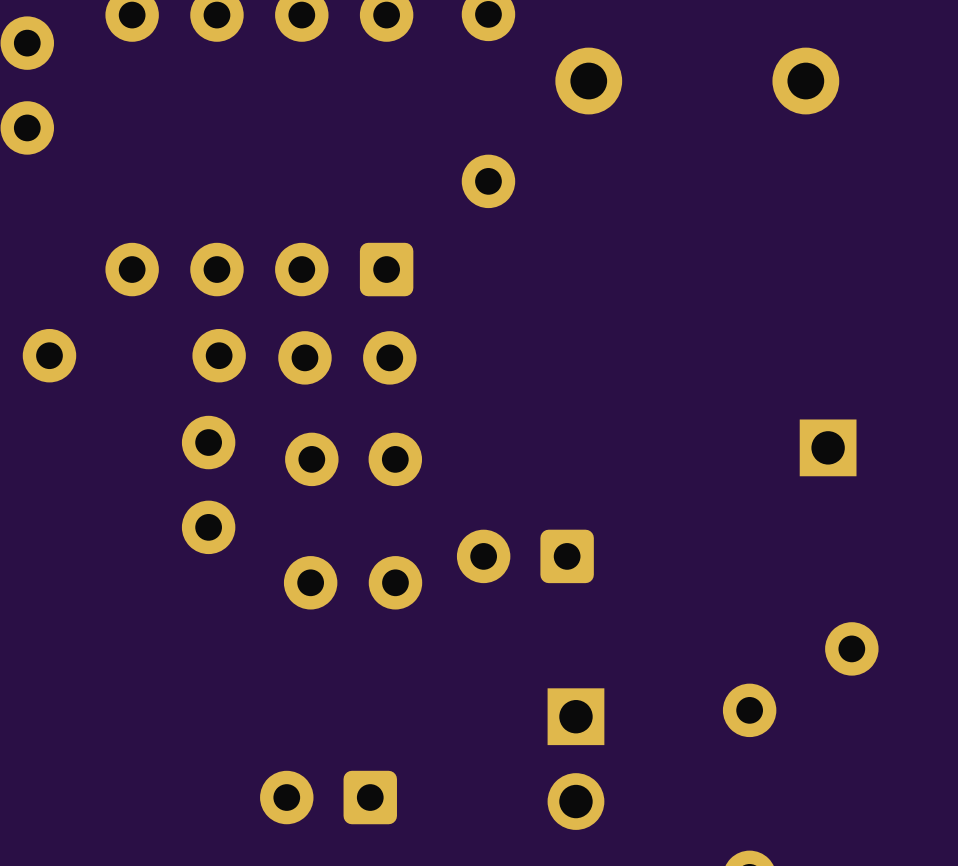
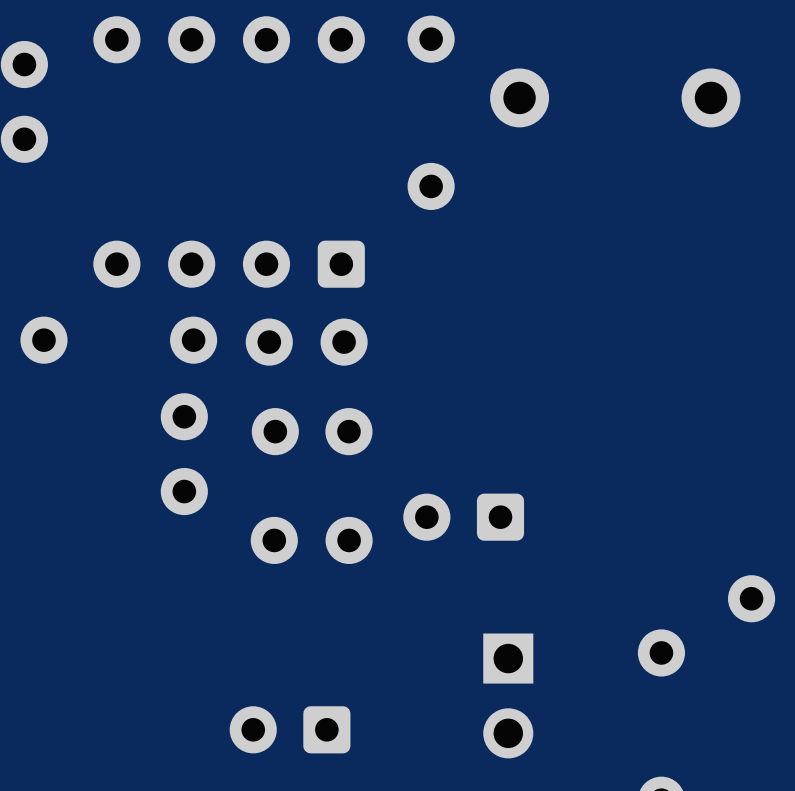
part: (828, 447) -> none

